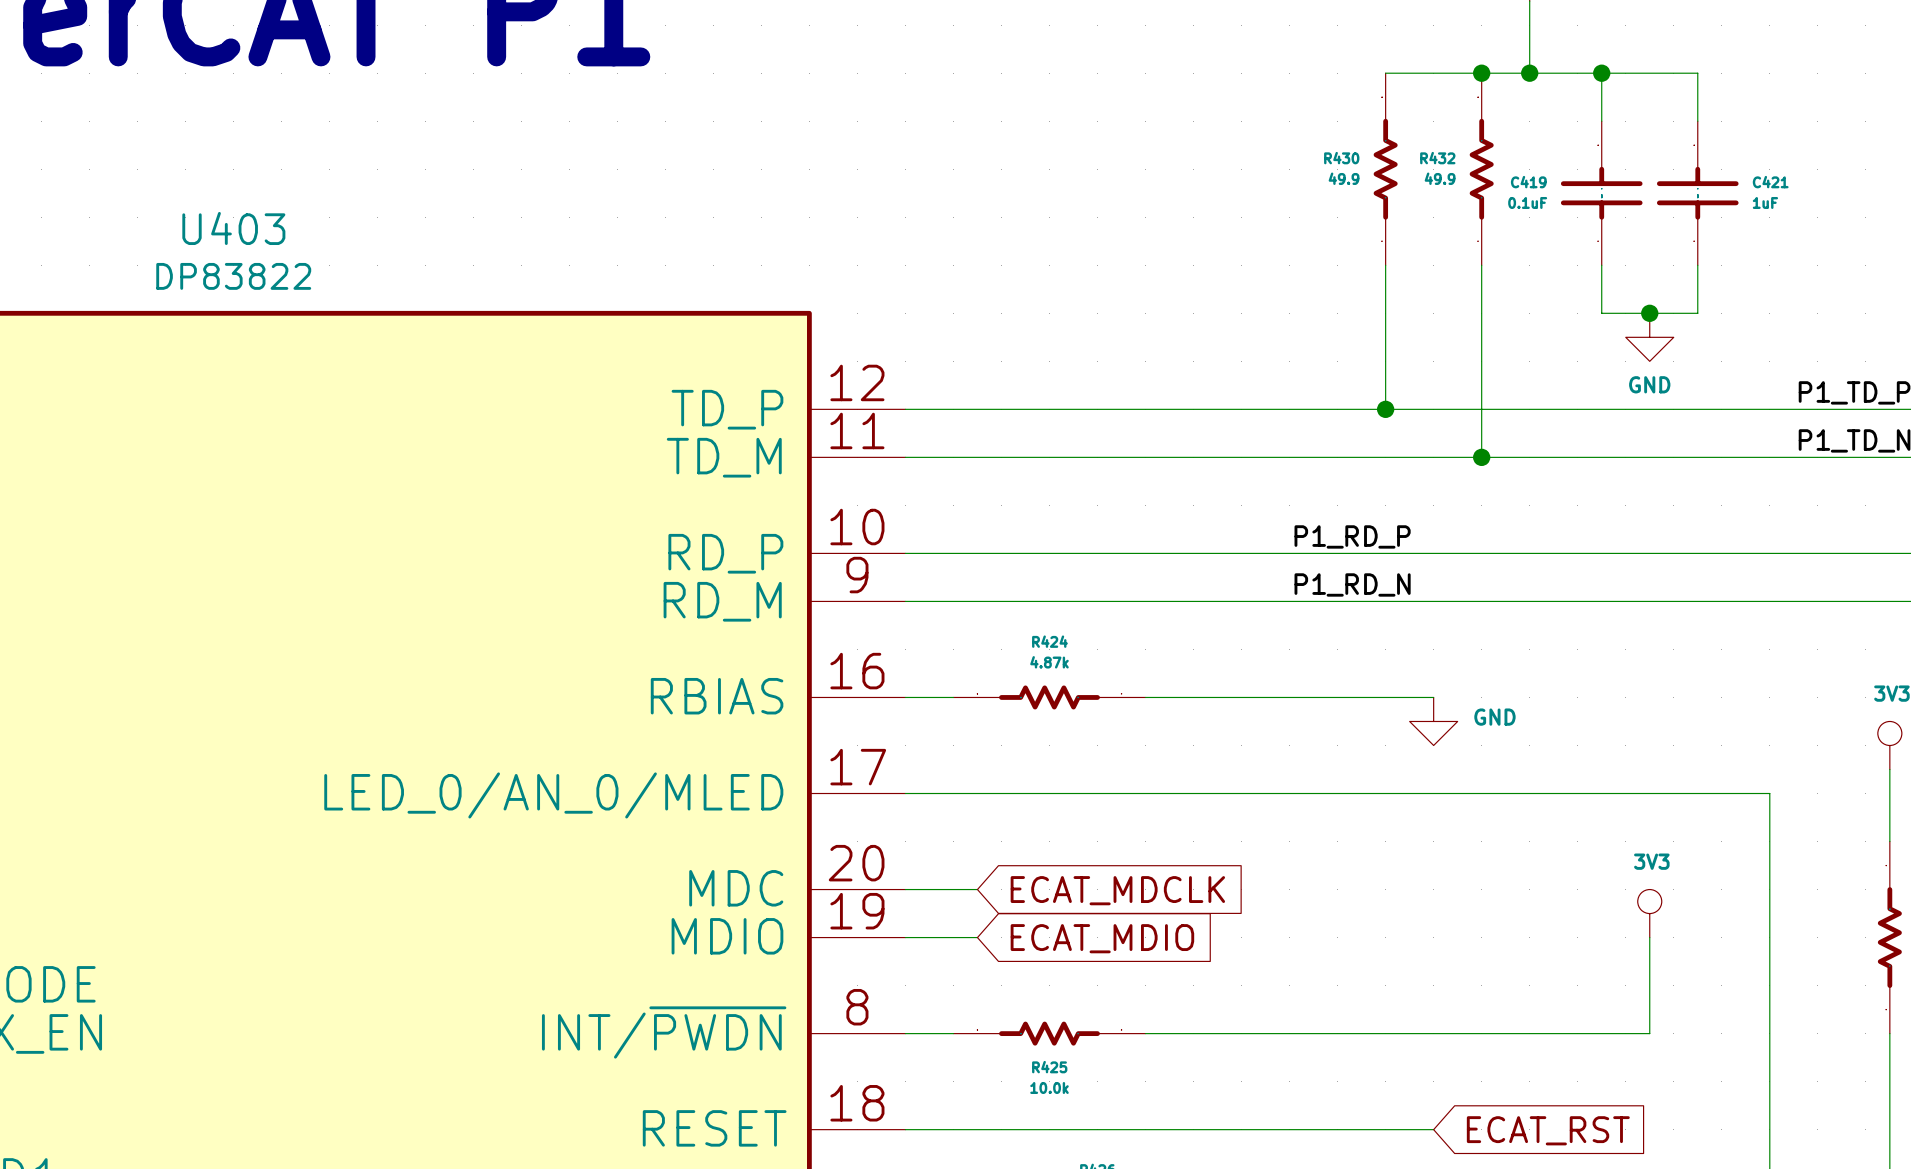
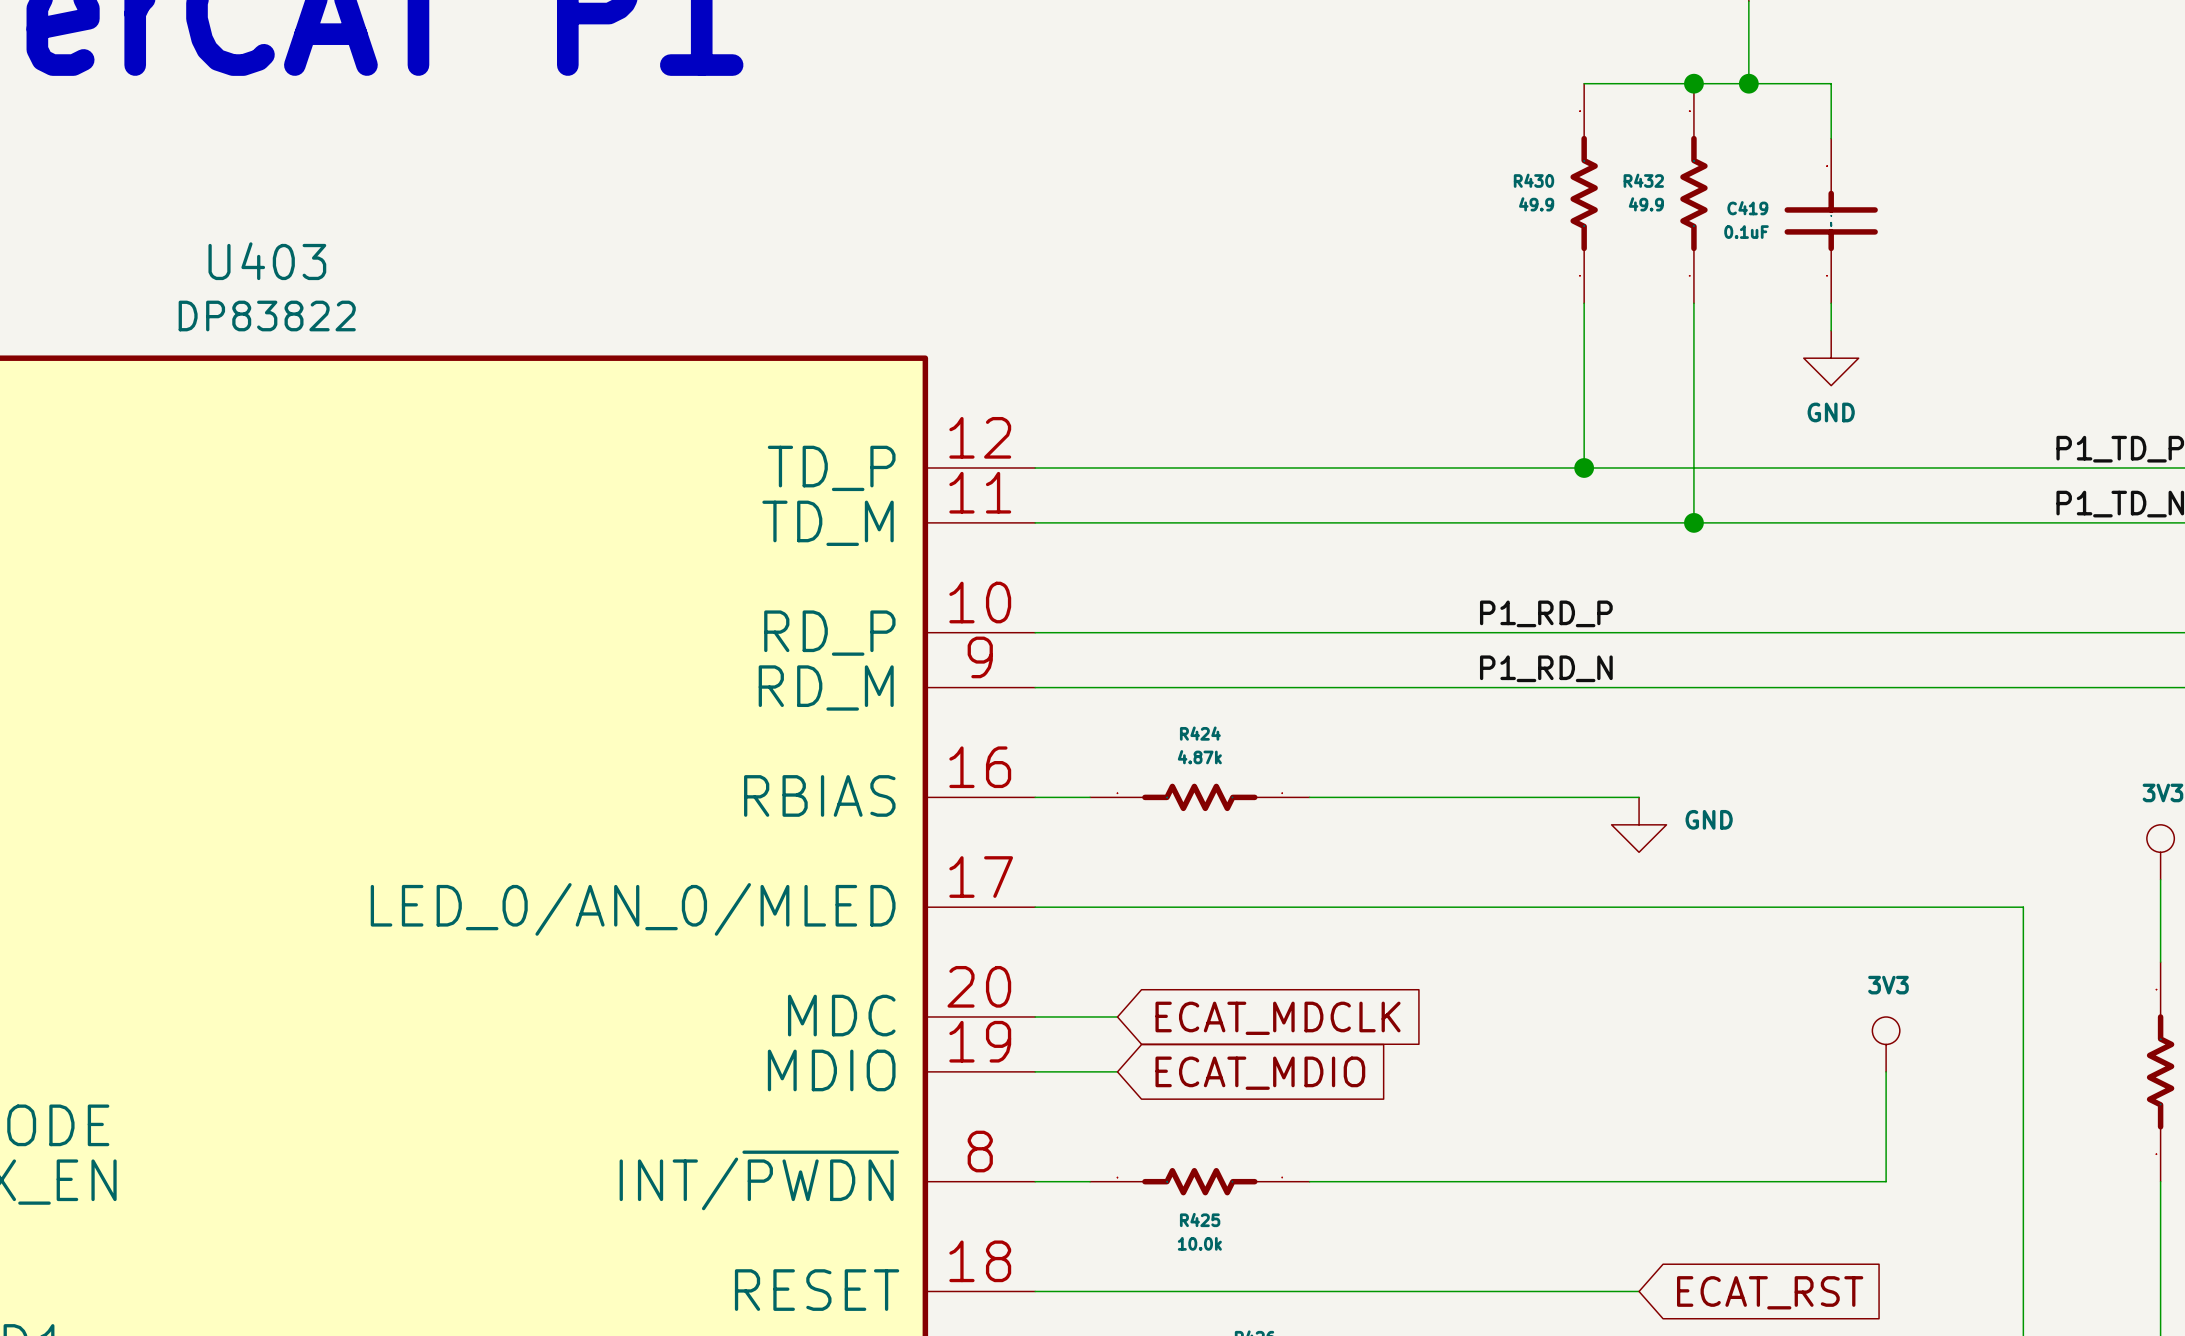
wire: (1601, 73) (1697, 73) (1697, 121) -> none
junction: (1601, 73) -> none
C421: 1uF (1697, 193) -> none
wire: (1697, 265) (1697, 313) (1601, 313) (1601, 289) -> none
junction: (1649, 313) -> none
power symbol position: GND (1649, 337) -> GND (1831, 358)

